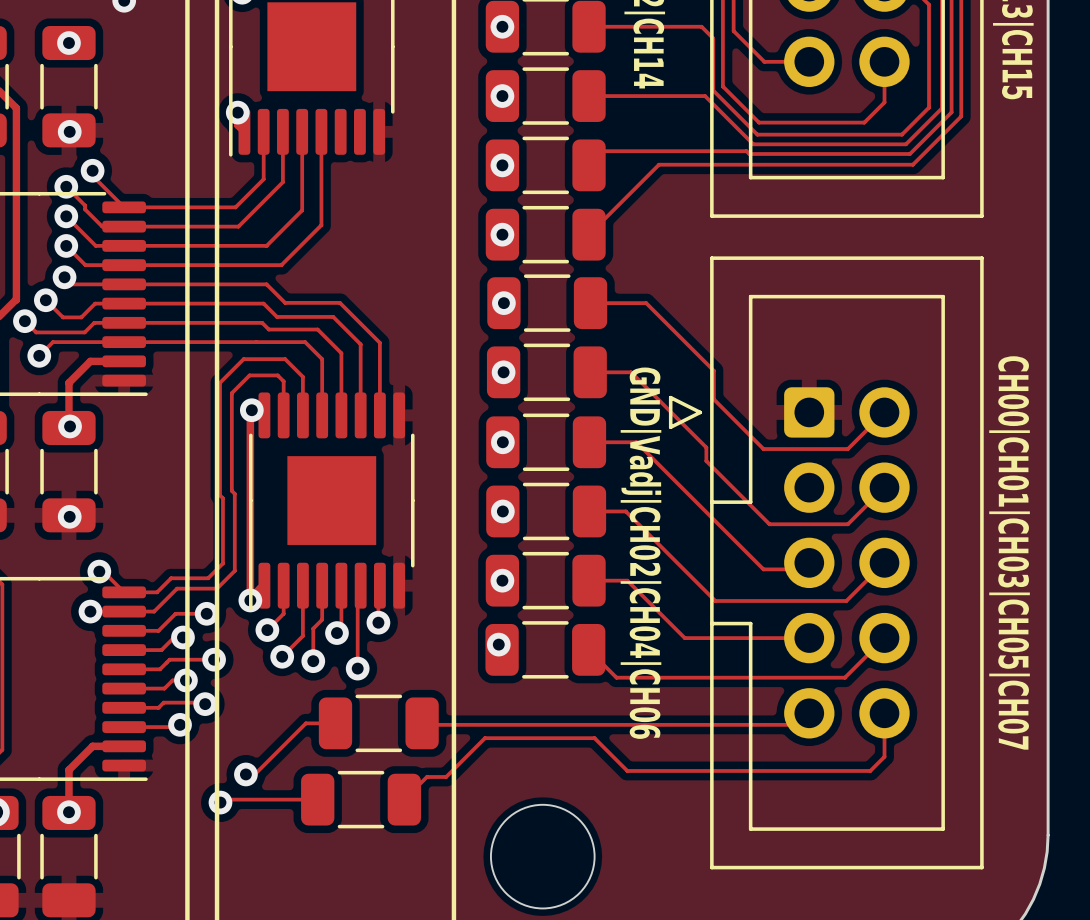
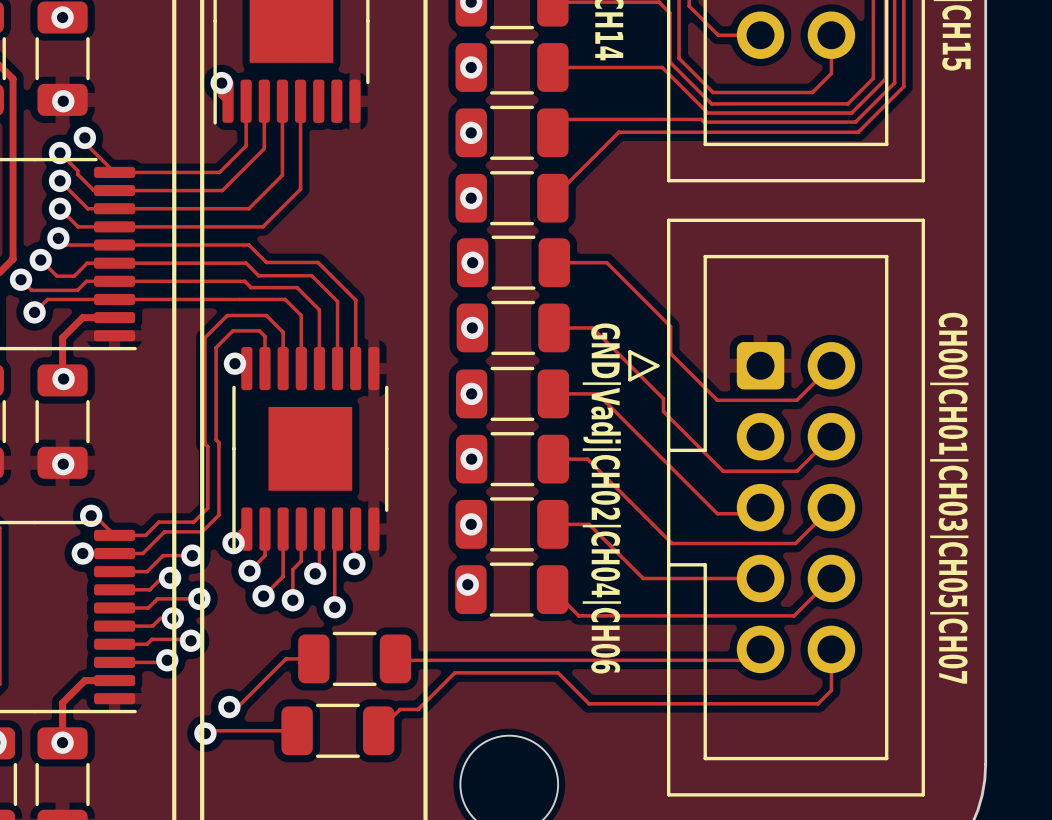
track: (251, 410) (250, 598) -> none

